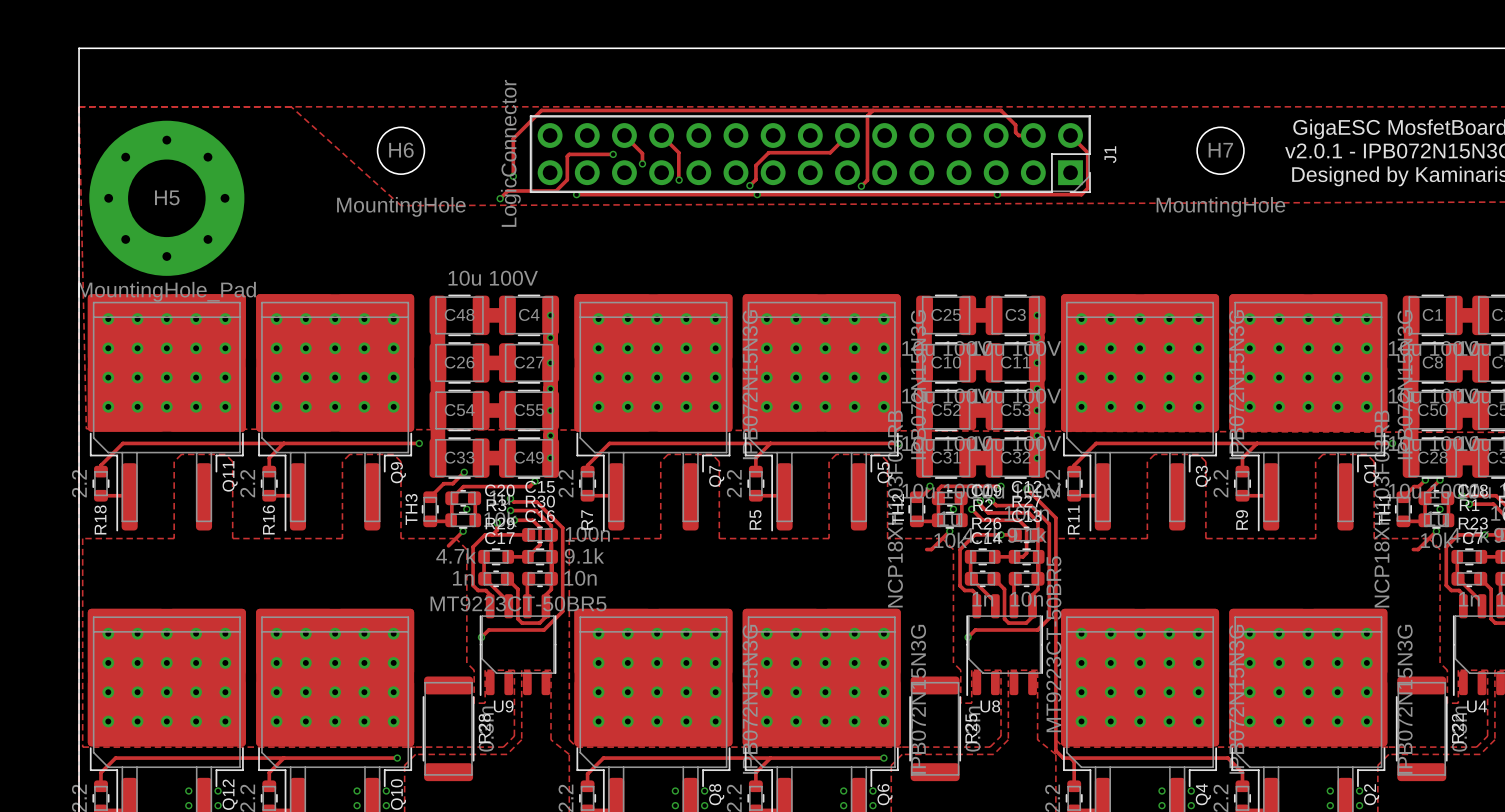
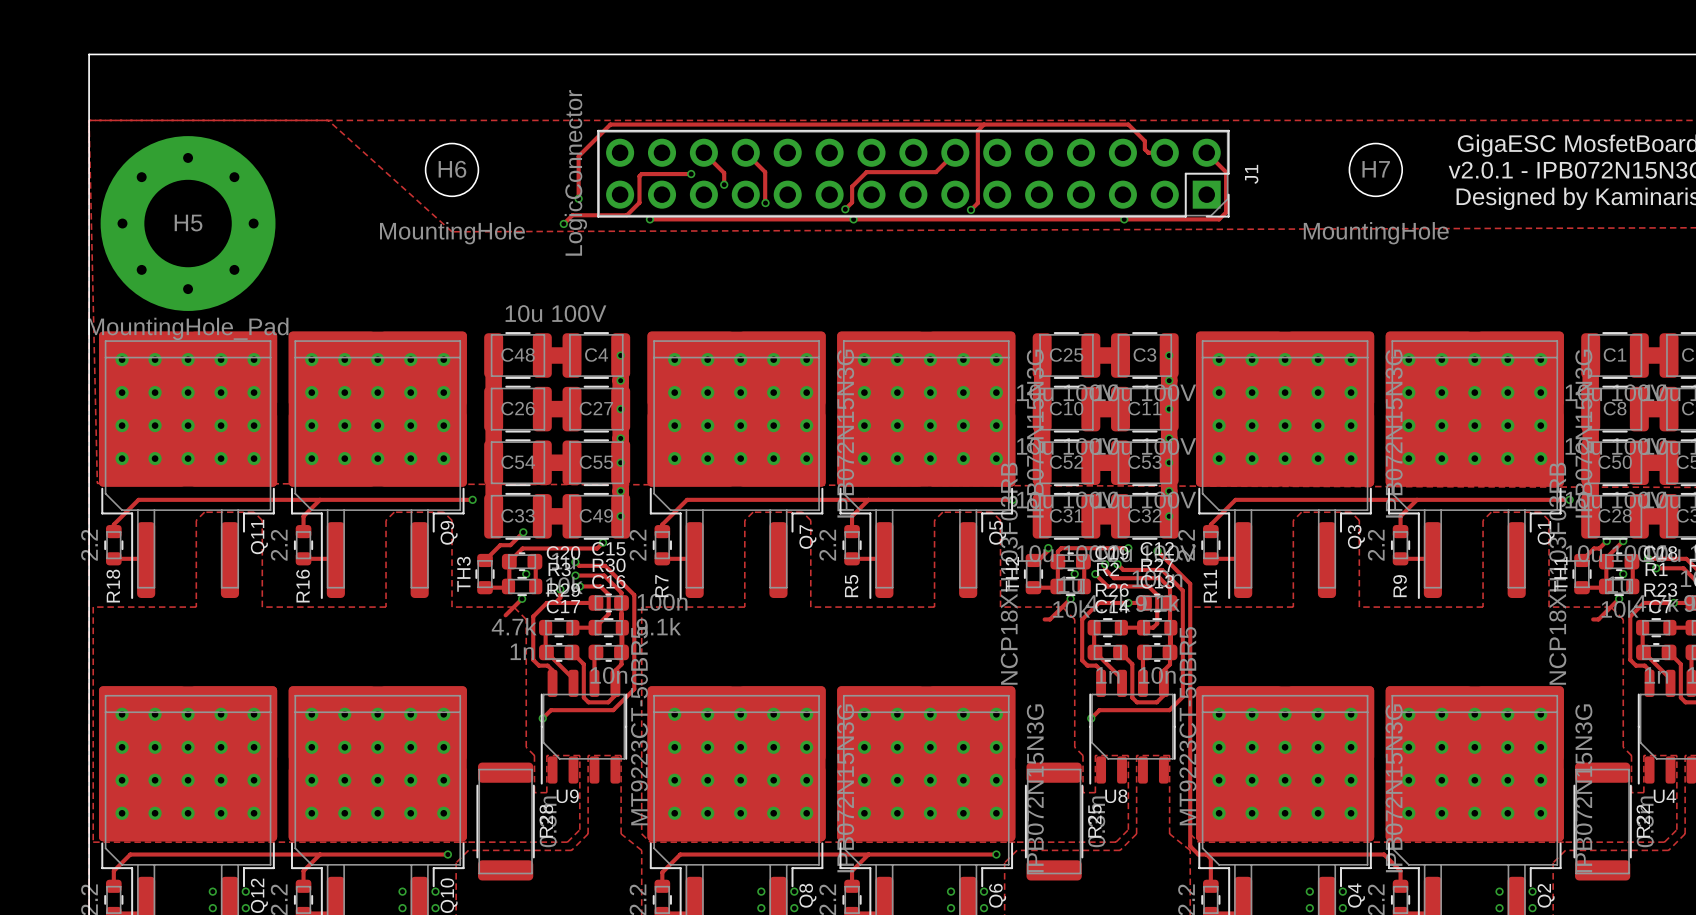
C16 value position: 10n (580, 578) -> 10n (608, 675)
U9 value rotation: 0° (518, 603) -> 90° counterclockwise (639, 726)

